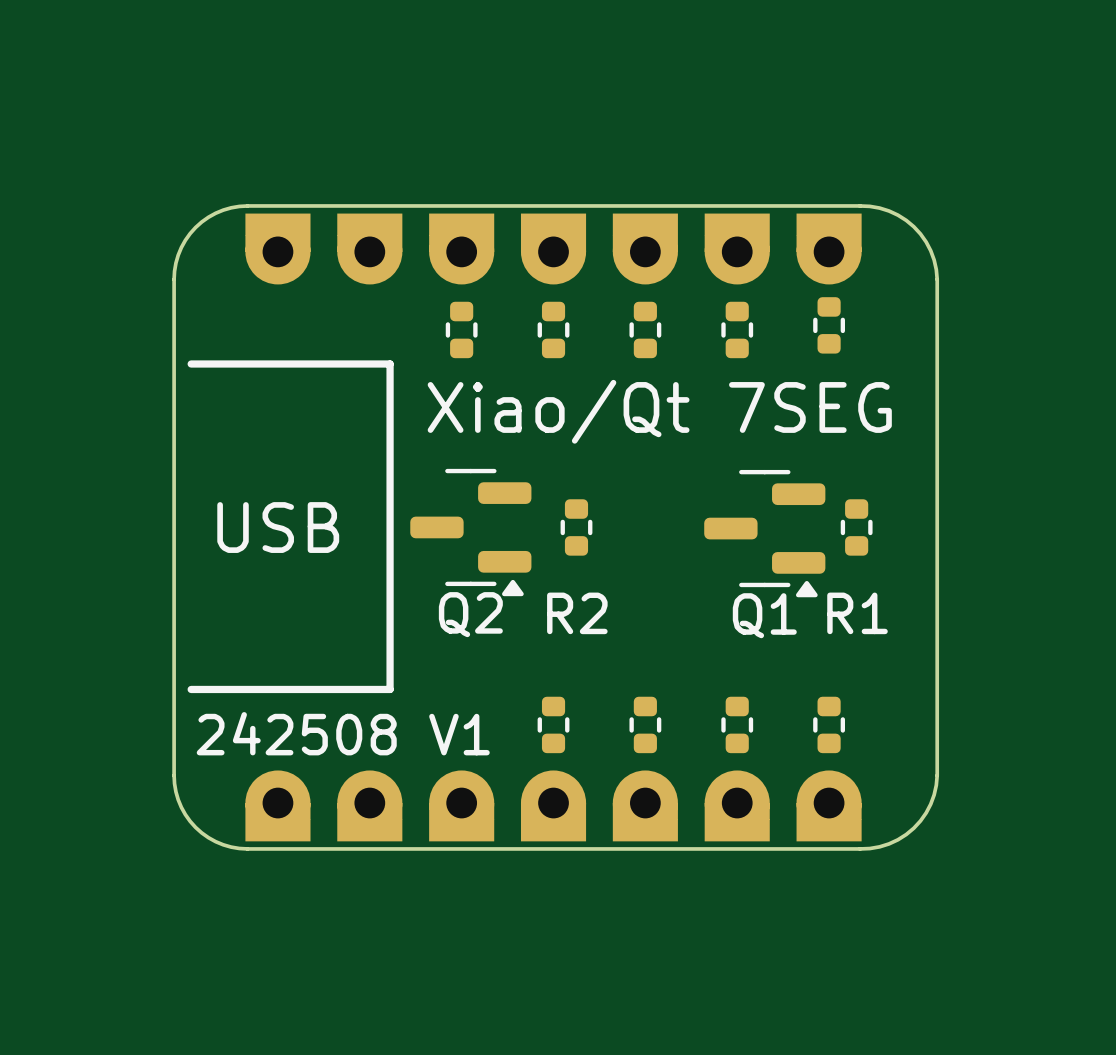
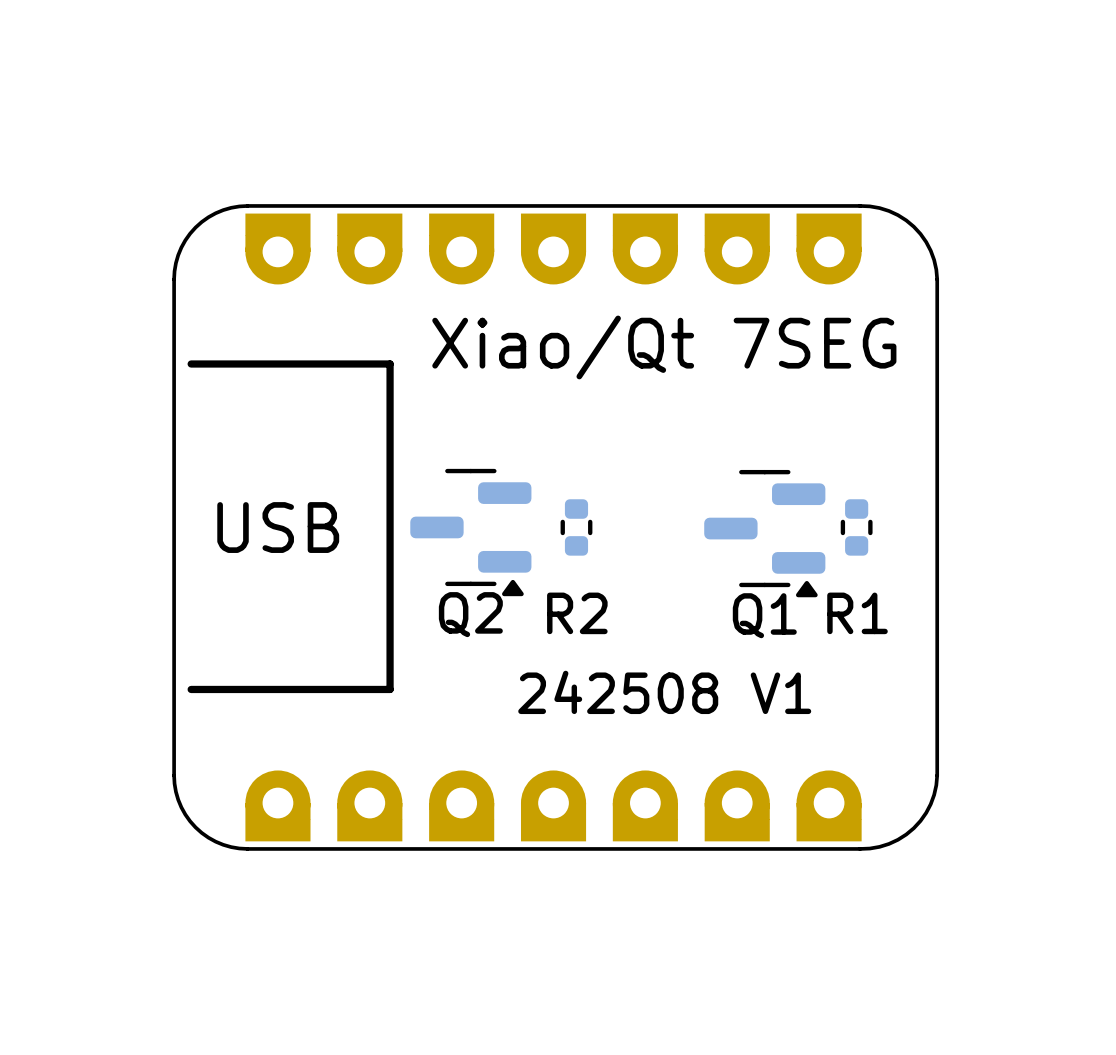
part: (829, 325) -> none
part: (461, 329) -> none
part: (553, 329) -> none
part: (645, 329) -> none
part: (737, 329) -> none
text position: Xiao/Qt 7SEG (659, 411) -> Xiao/Qt 7SEG (664, 347)
part: (553, 724) -> none
part: (645, 724) -> none
part: (737, 724) -> none
part: (829, 724) -> none
text position: 242508 V1 (343, 733) -> 242508 V1 (664, 692)

